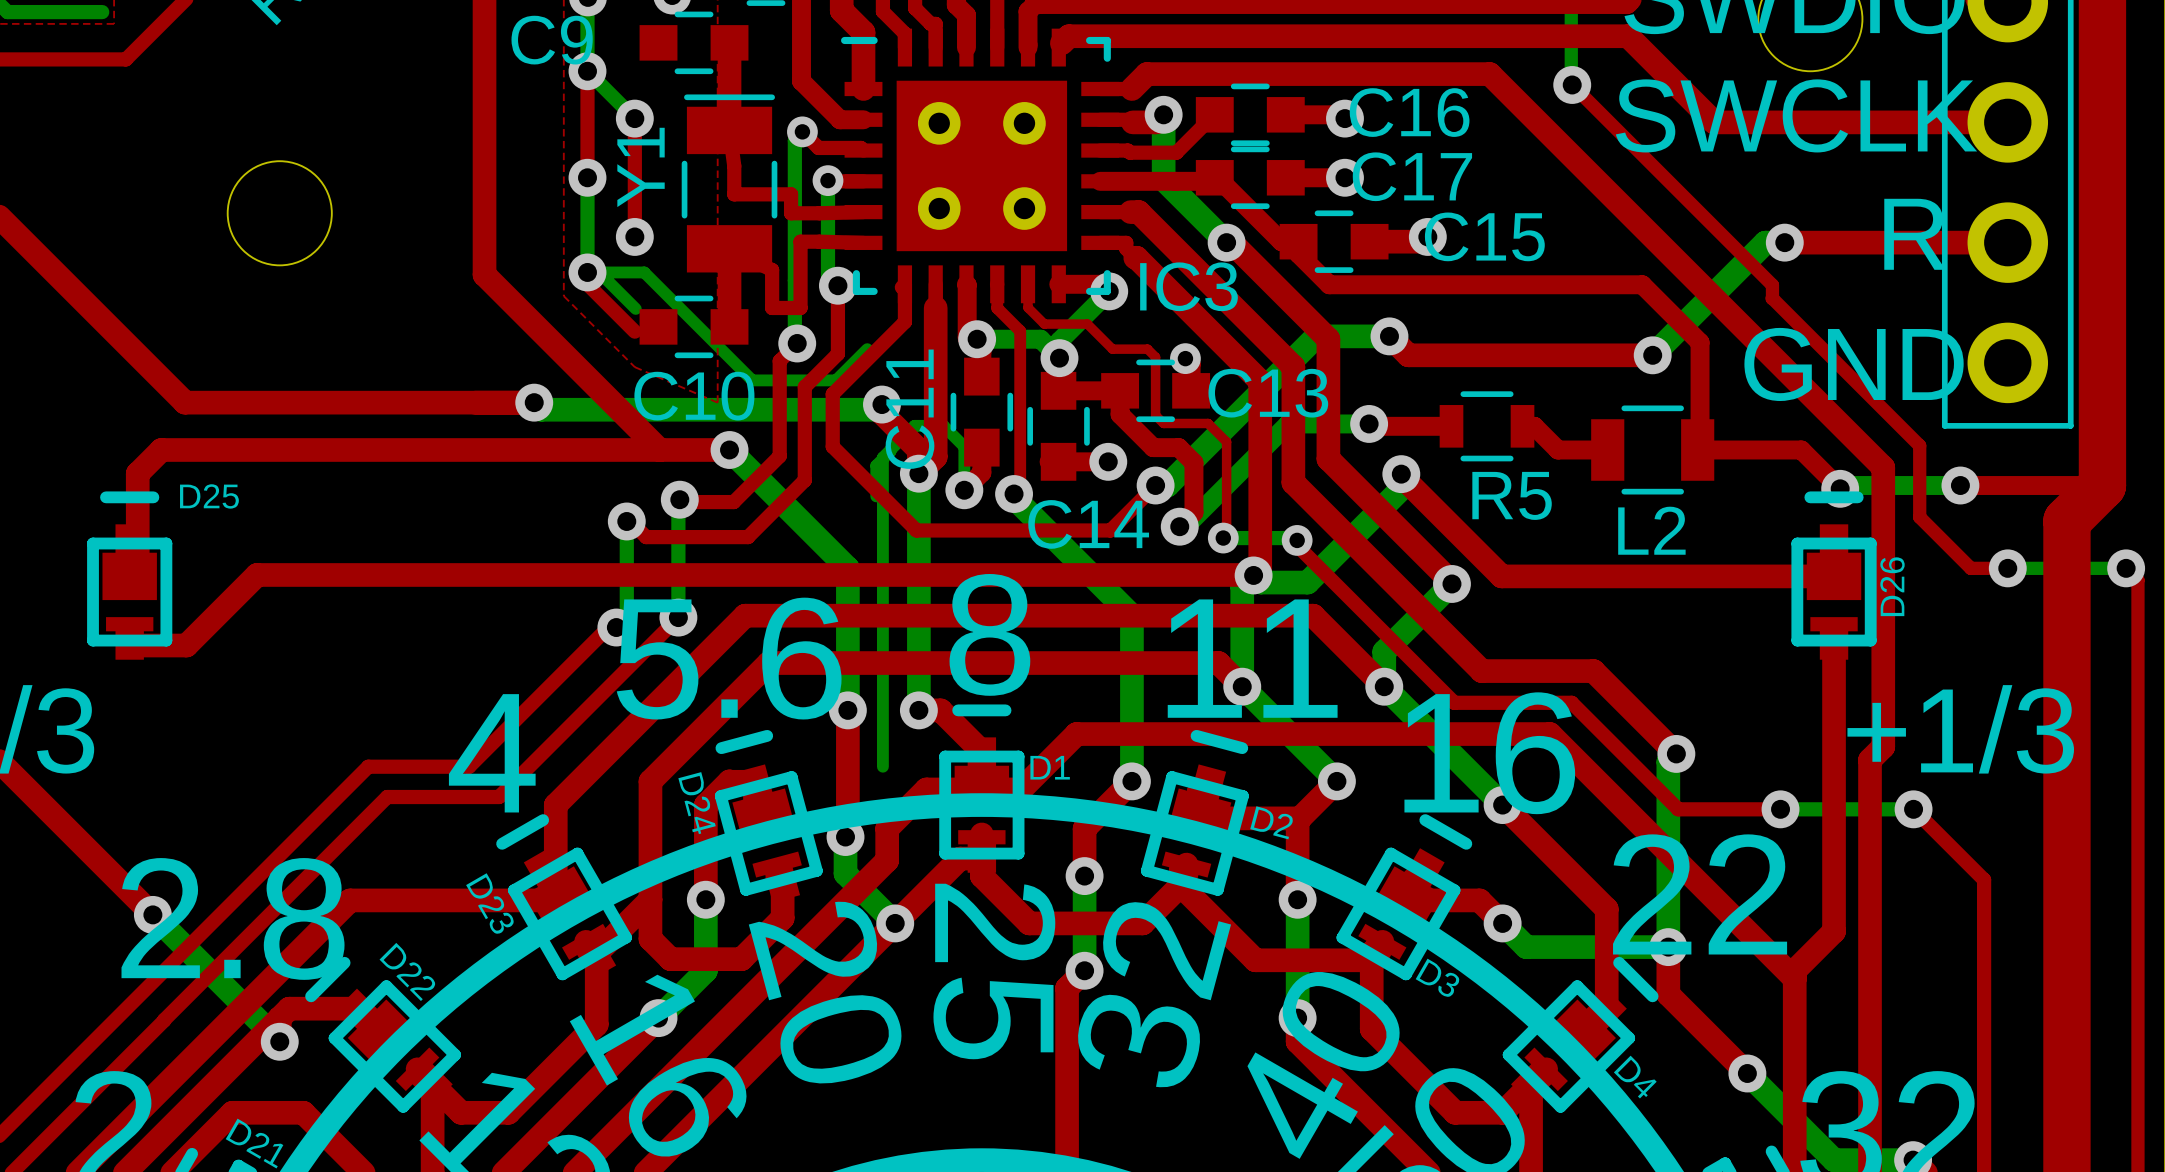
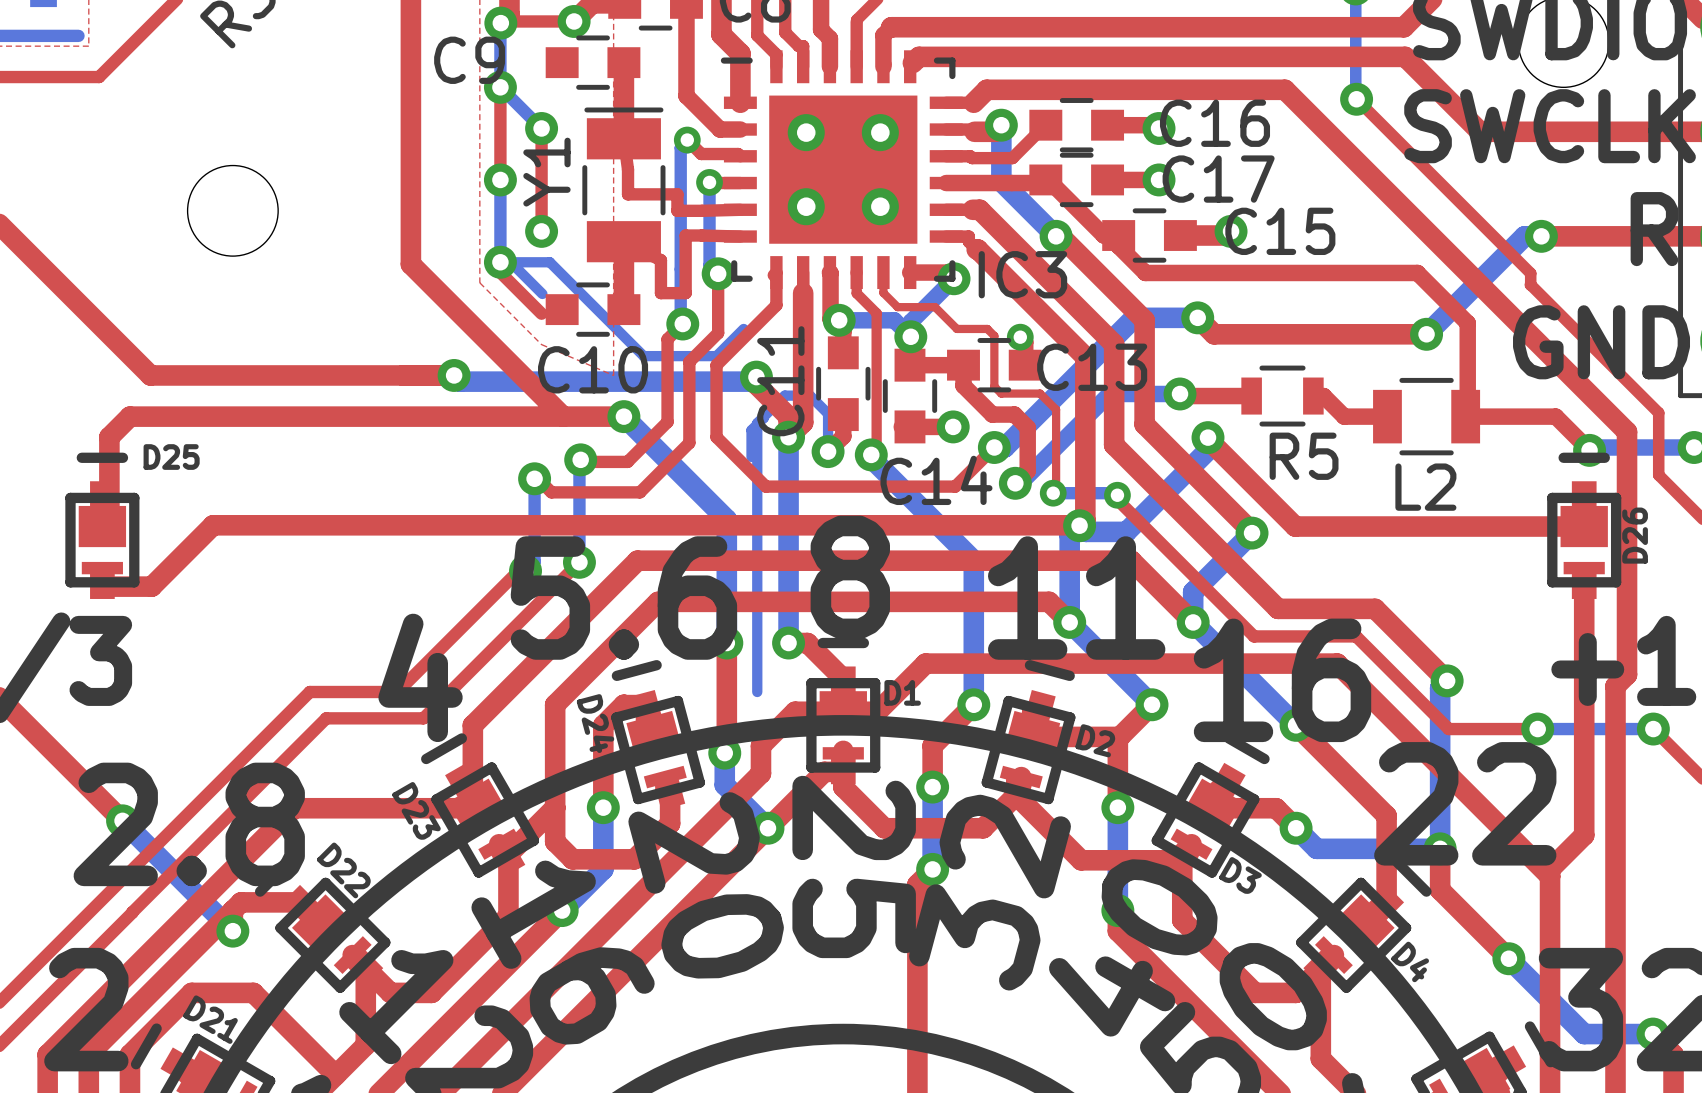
top track: (836, 390) (832, 394) (832, 446) (916, 530) -> (716, 365) (716, 437) (765, 486) (786, 486)

